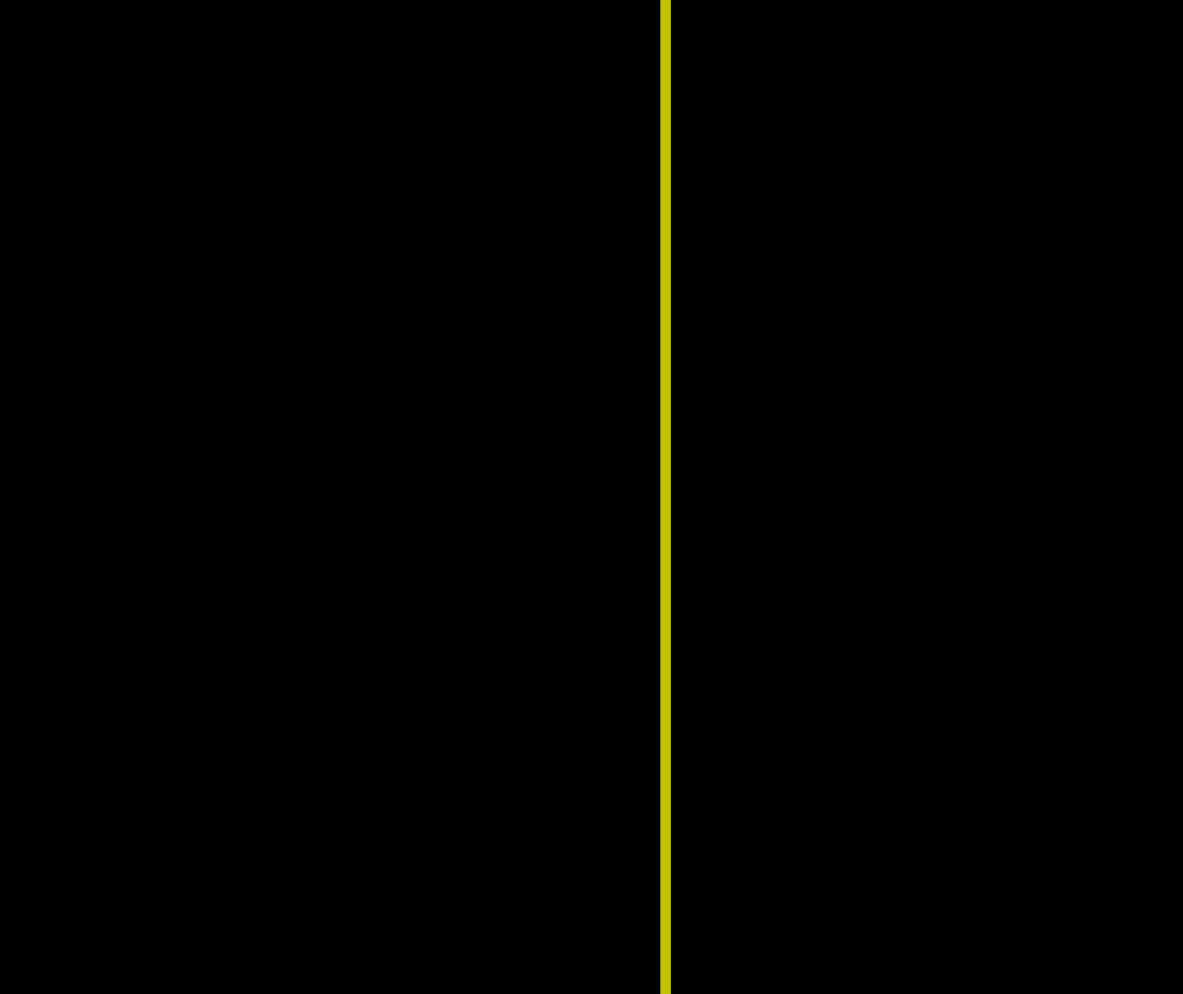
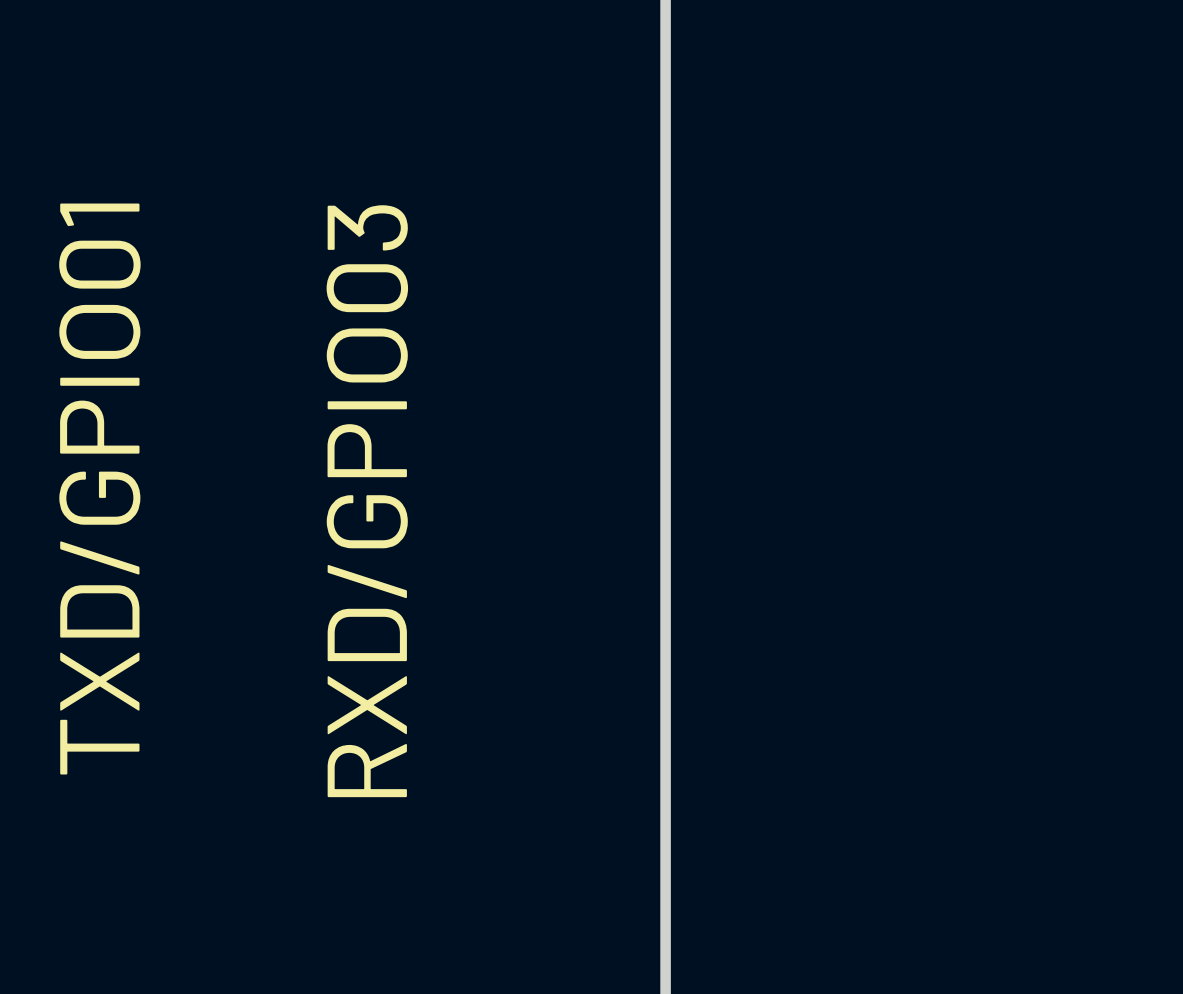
text: none -> TXD/GPIO01 (99, 489)
text: none -> RXD/GPIO03 (367, 501)

